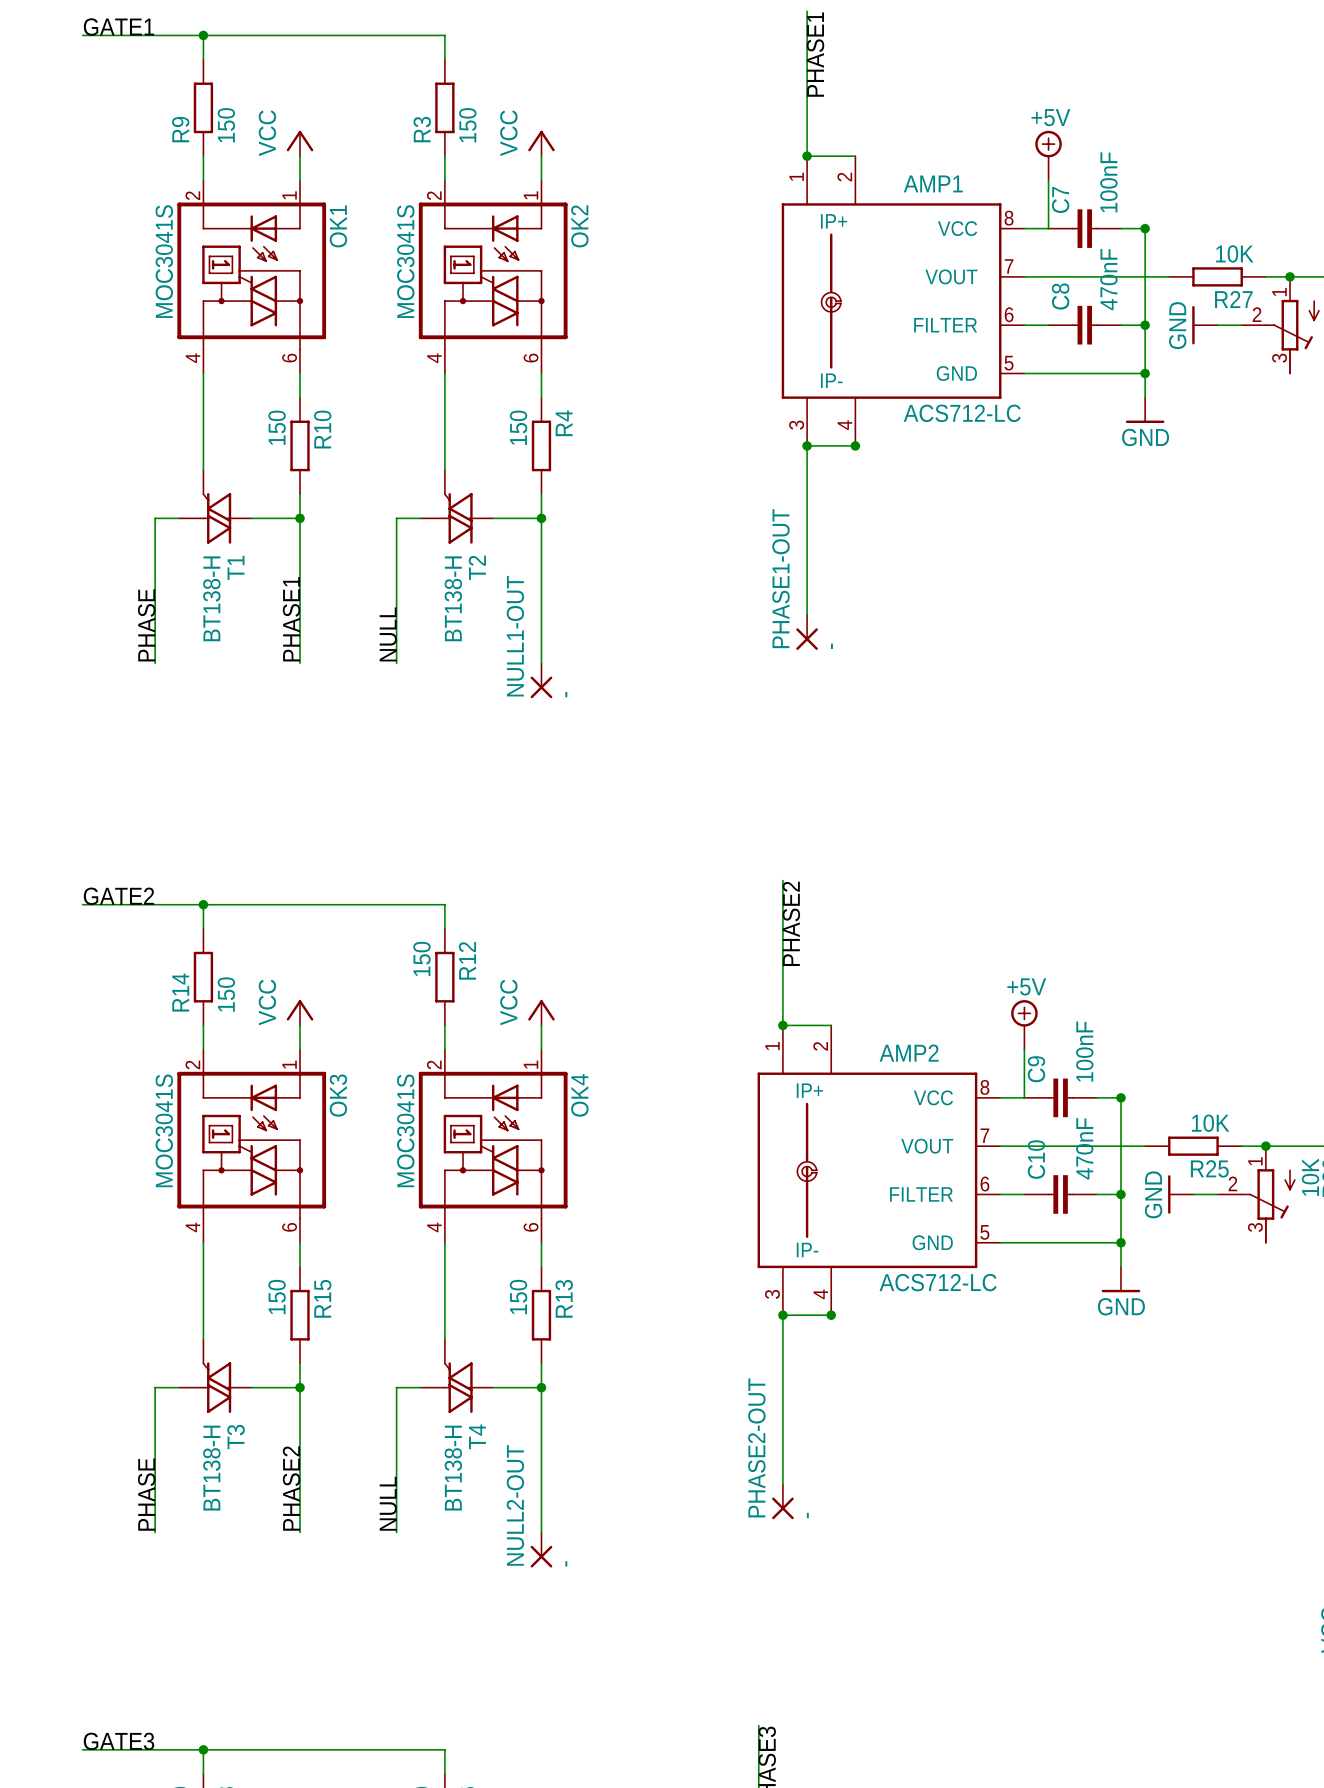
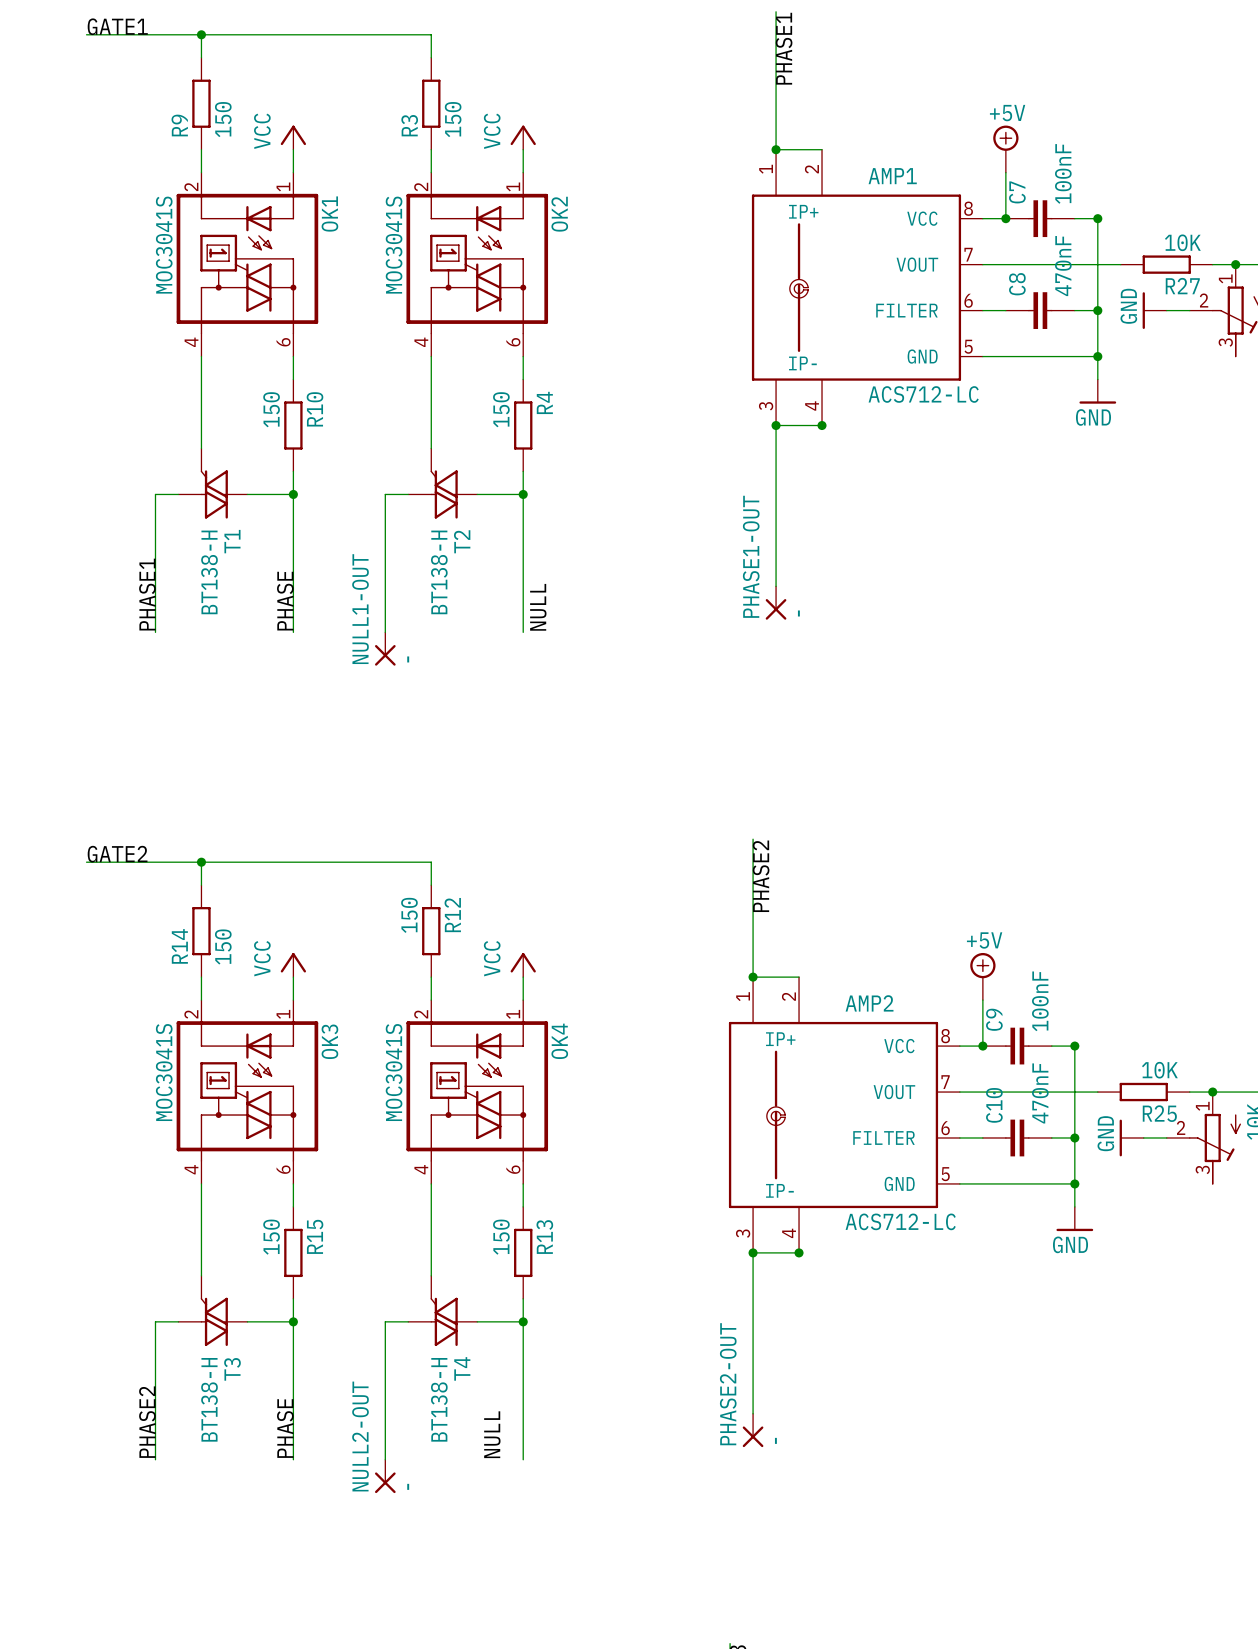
junction: none -> (1005, 218)
label: PHASE1 (291, 619) -> PHASE (285, 601)
label: PHASE (146, 625) -> PHASE1 (147, 594)
label position: NULL (388, 634) -> NULL (538, 607)
NULL1-OUT position: (541, 680) -> (385, 649)
junction: none -> (982, 1046)
label: PHASE2 (291, 1488) -> PHASE (285, 1428)
label: PHASE (146, 1494) -> PHASE2 (147, 1422)
label position: NULL (388, 1503) -> NULL (492, 1434)
NULL2-OUT position: (541, 1550) -> (385, 1476)

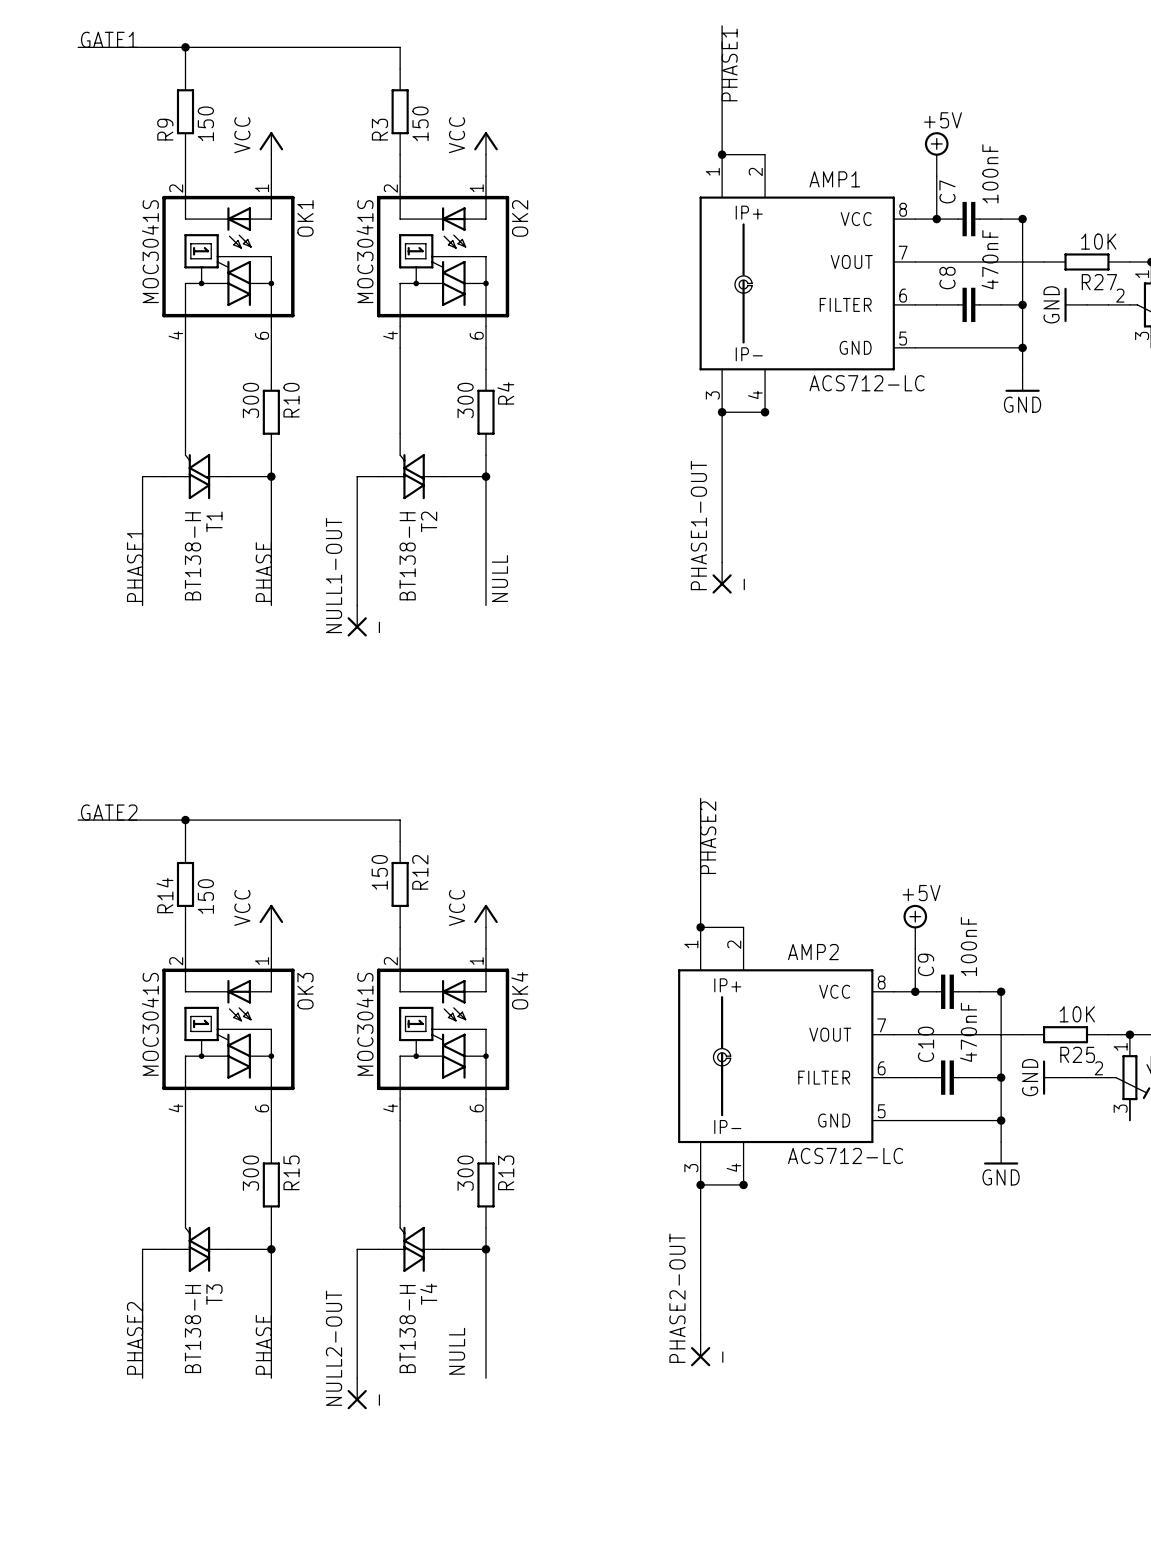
R10 value: 150 (271, 409) -> 300 (250, 400)
R4 value: 150 (501, 409) -> 300 (465, 400)
R15 value: 150 (271, 1237) -> 300 (250, 1173)
R13 value: 150 (501, 1237) -> 300 (465, 1173)

